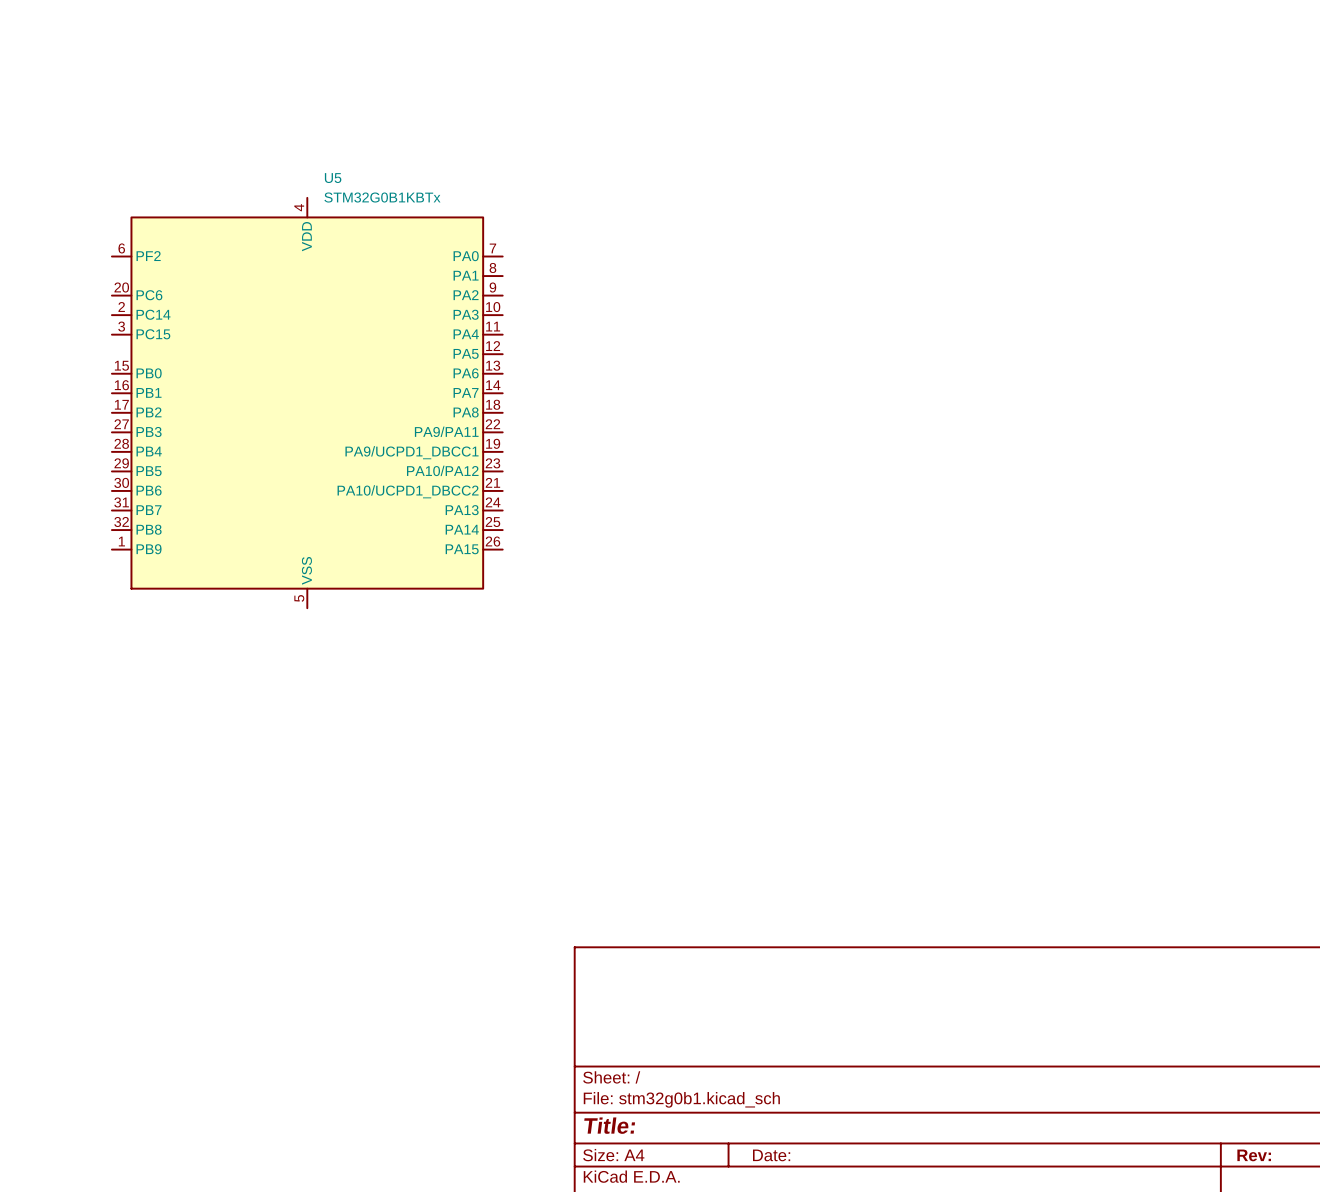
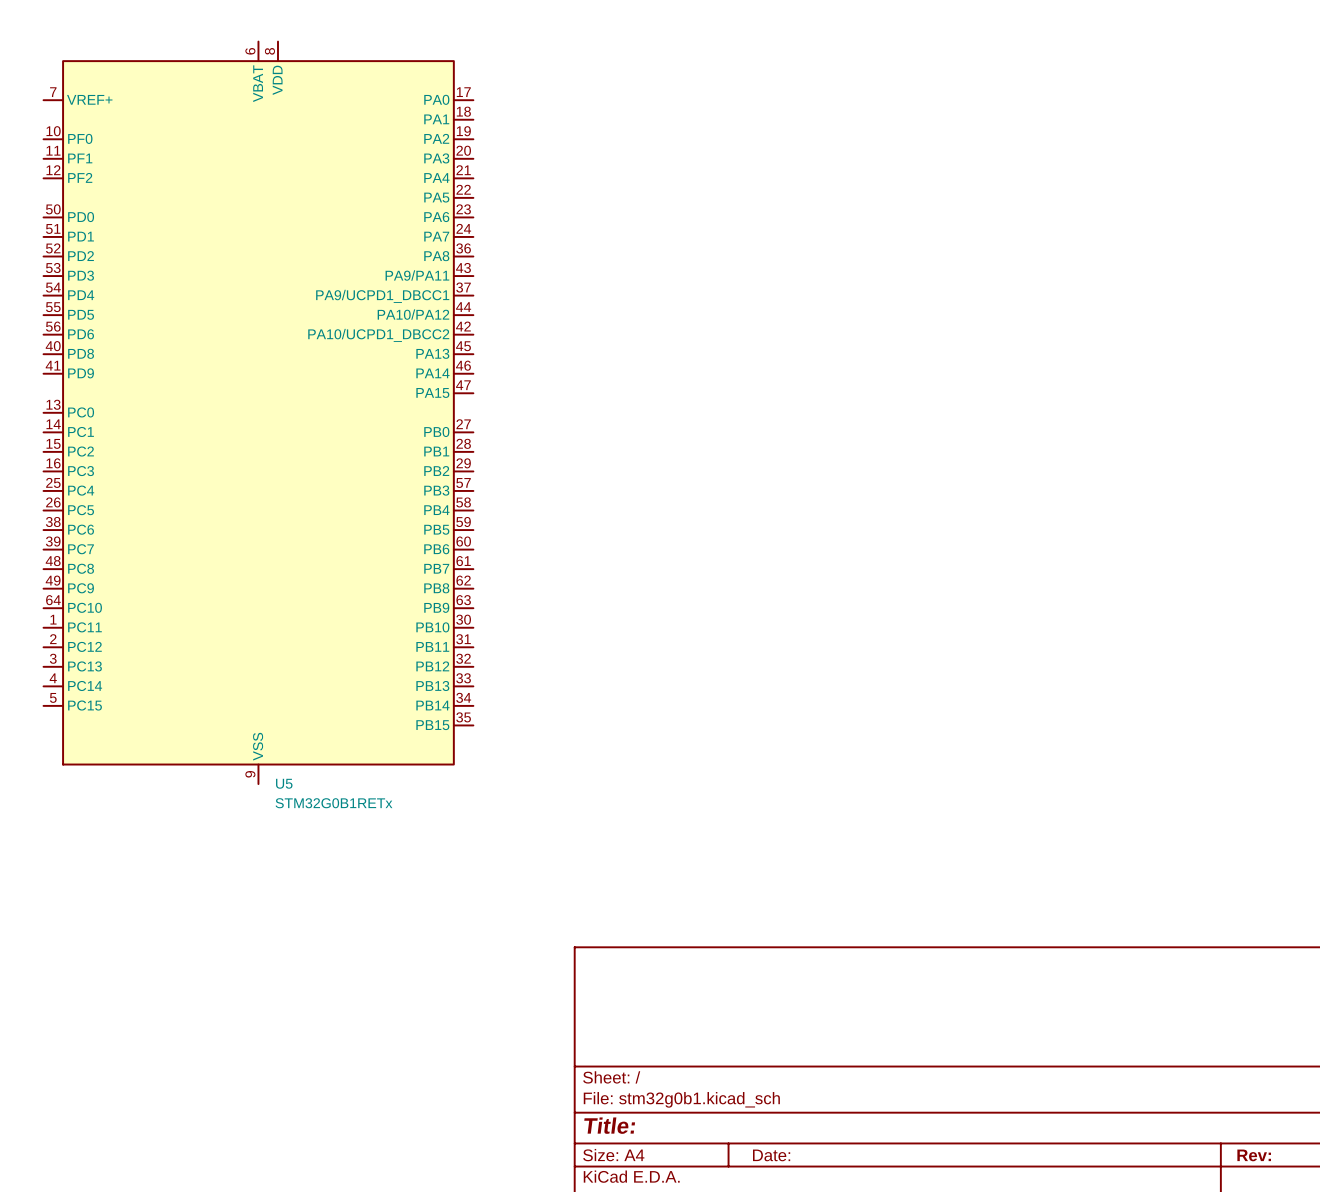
U5 name position: U5 (333, 178) -> U5 (284, 783)
U5 symbol: [111, 197, 503, 609] -> [43, 41, 474, 785]
U5 value: STM32G0B1KBTx (382, 197) -> STM32G0B1RETx (333, 803)

